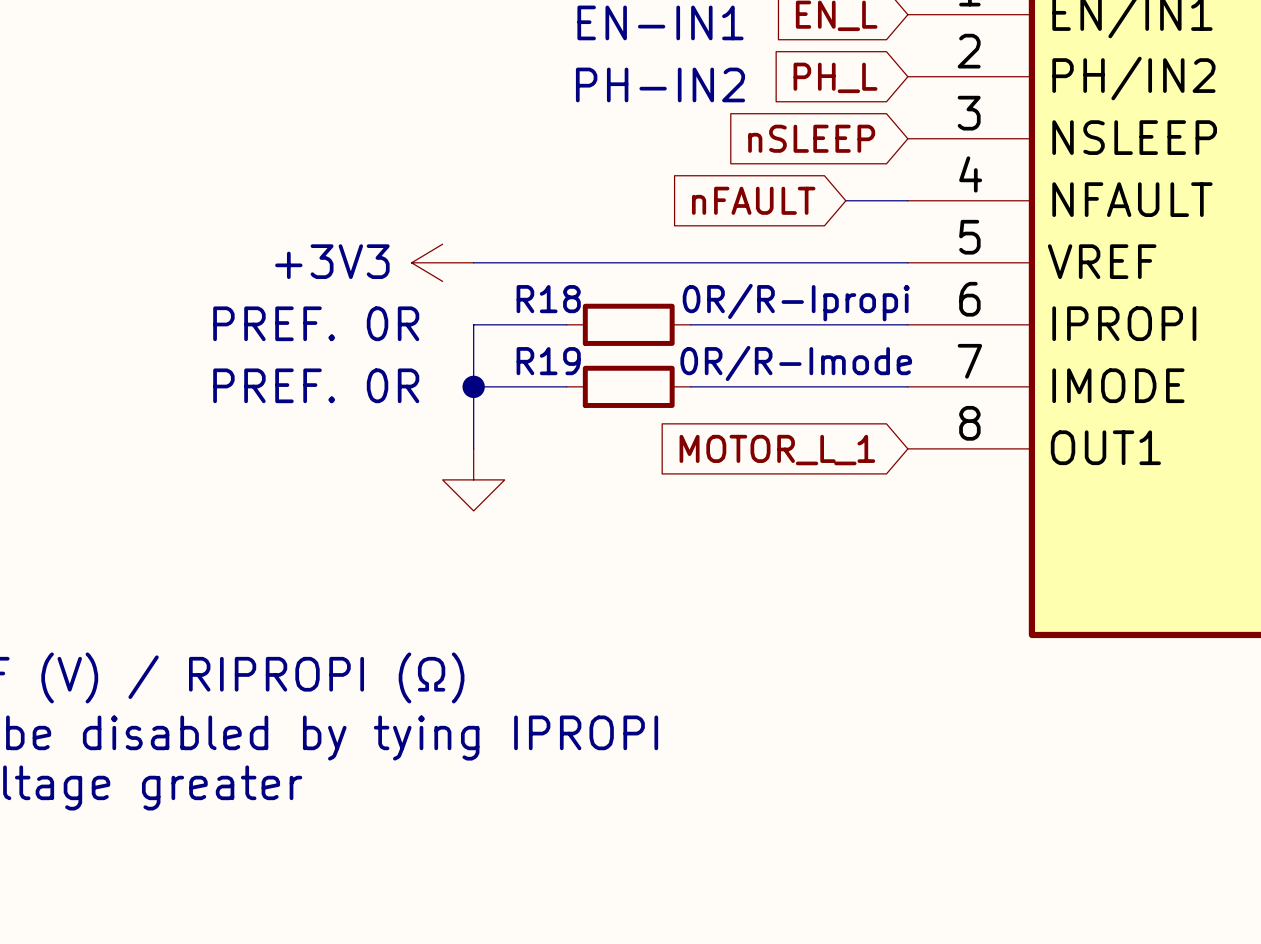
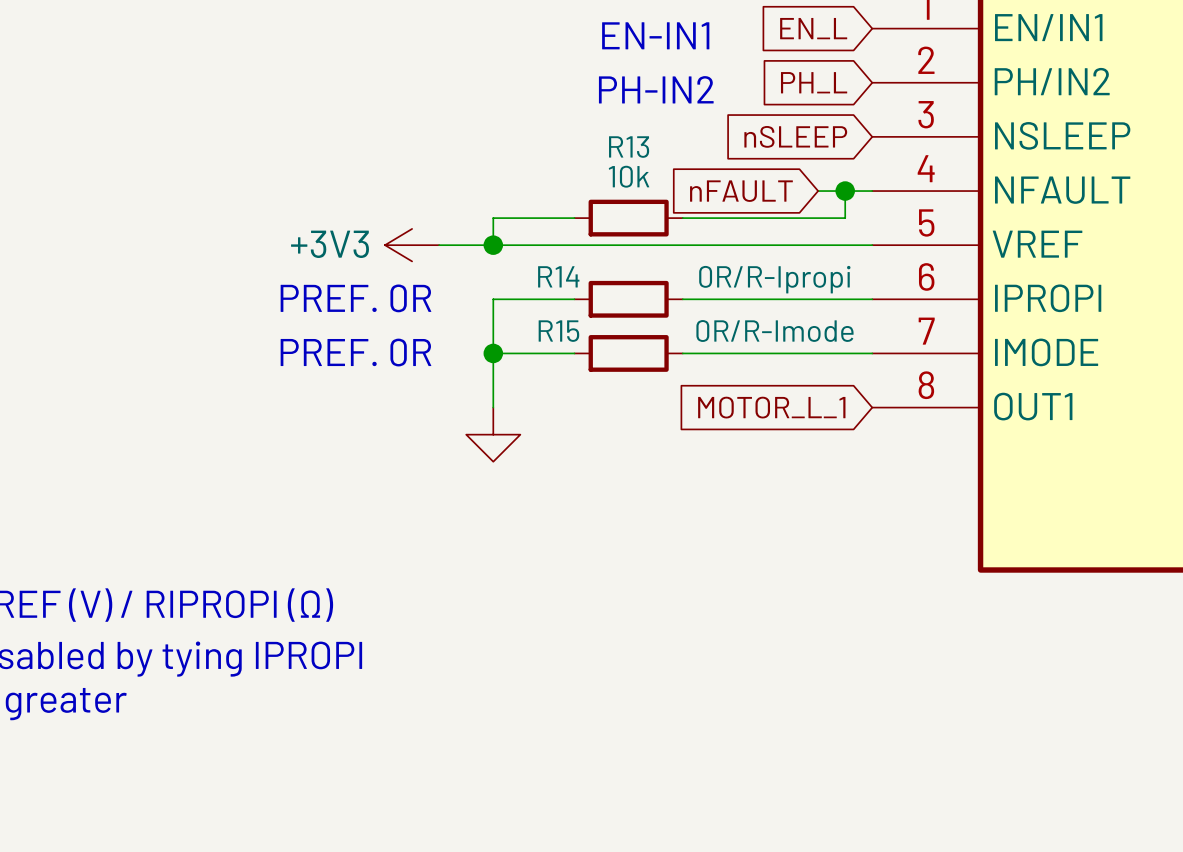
wire: none -> (845, 191) (845, 218) (682, 218)
junction: none -> (845, 191)
wire: none -> (574, 218) (493, 218) (493, 245) (439, 245)
R13: none -> 10k (628, 218)
power symbol position: +3V3 (442, 262) -> +3V3 (412, 245)
junction: none -> (493, 245)
R18 name: R18 (548, 299) -> R14 (558, 276)
R19 name: R19 (548, 361) -> R15 (558, 331)

